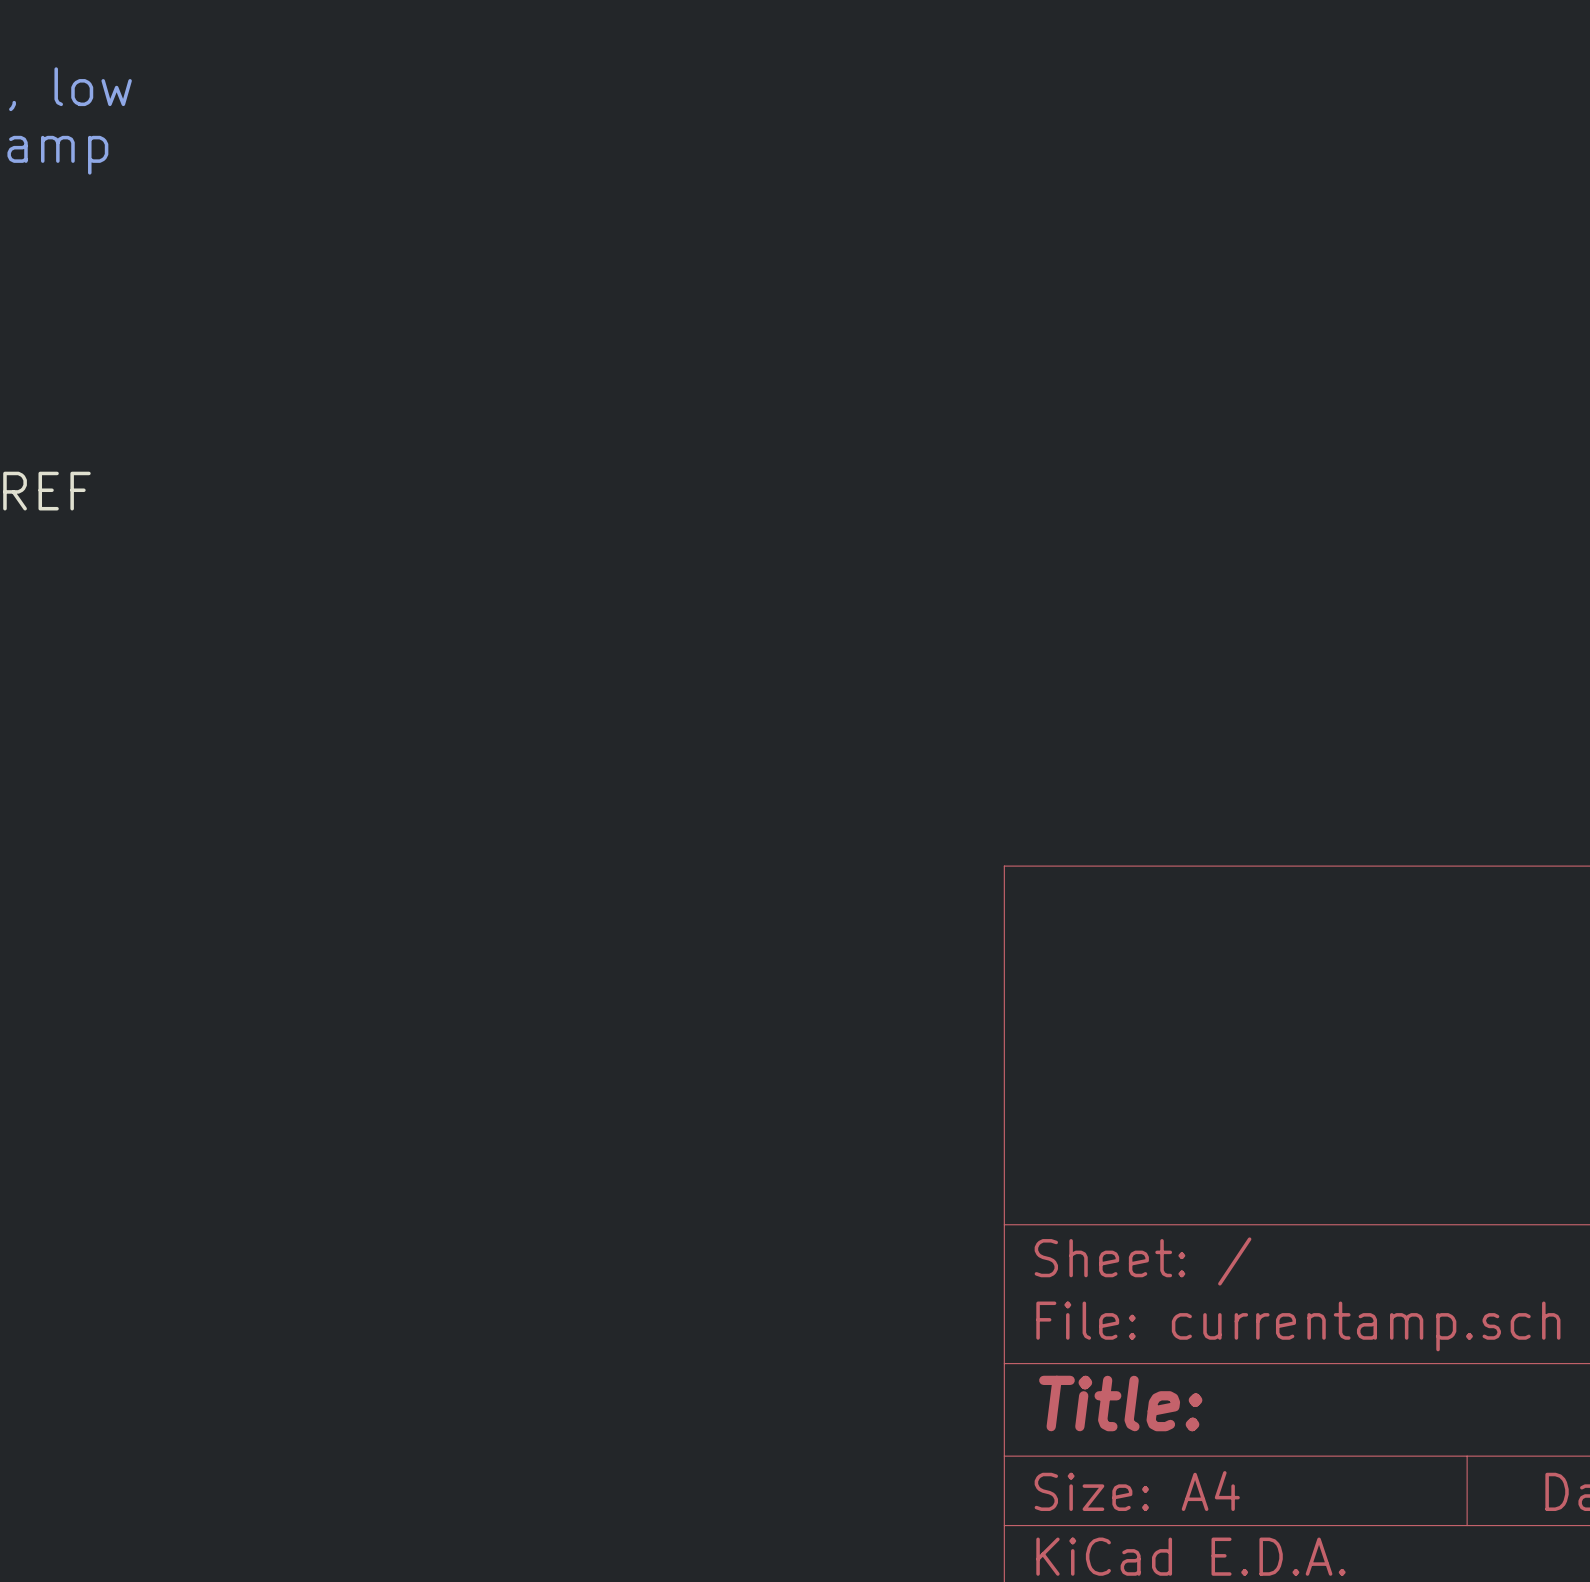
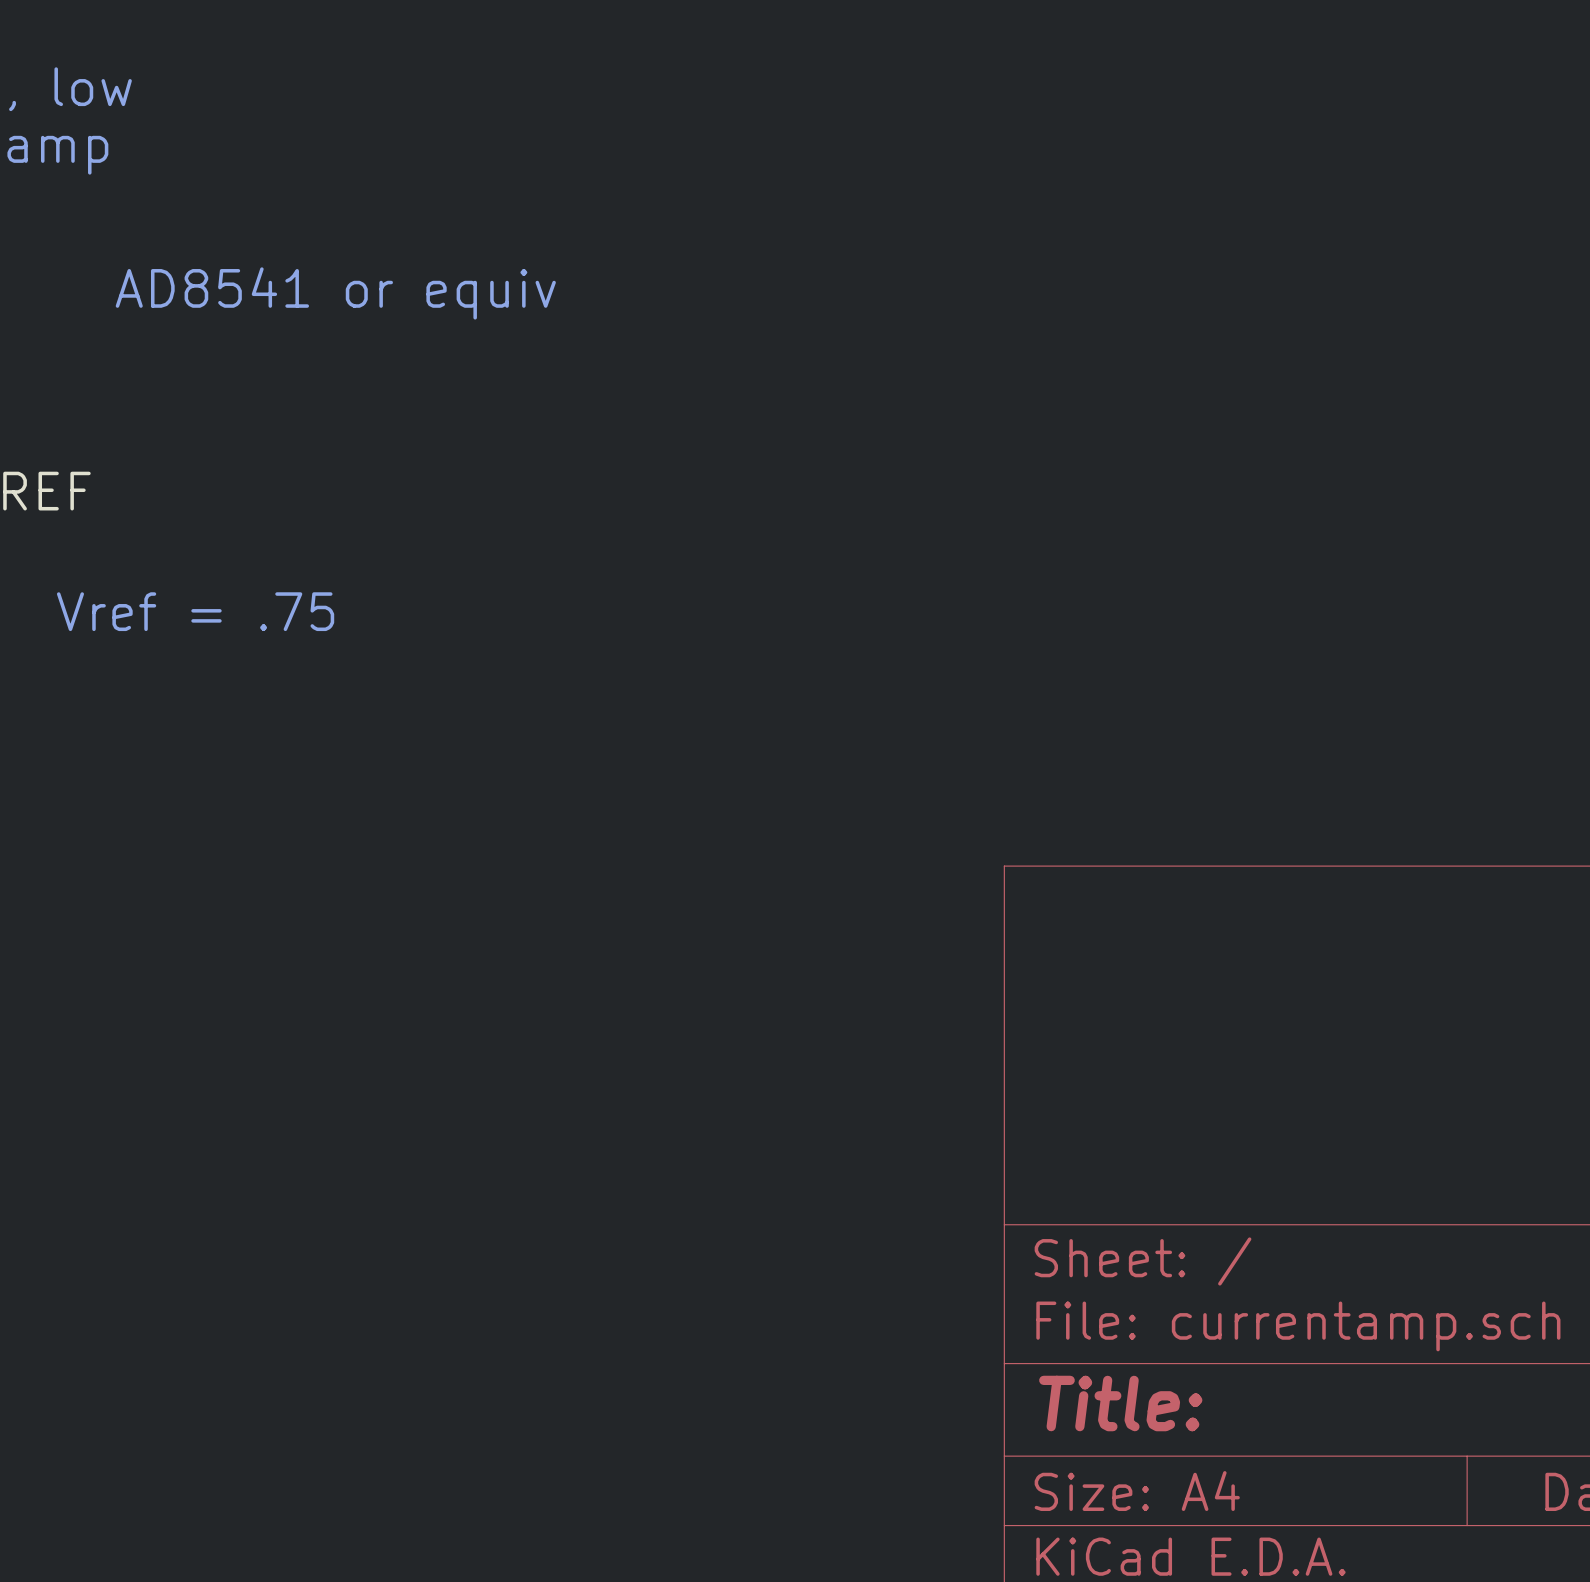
text: none -> AD8541 or equiv (335, 293)
text: none -> Vref = .75 (195, 611)

